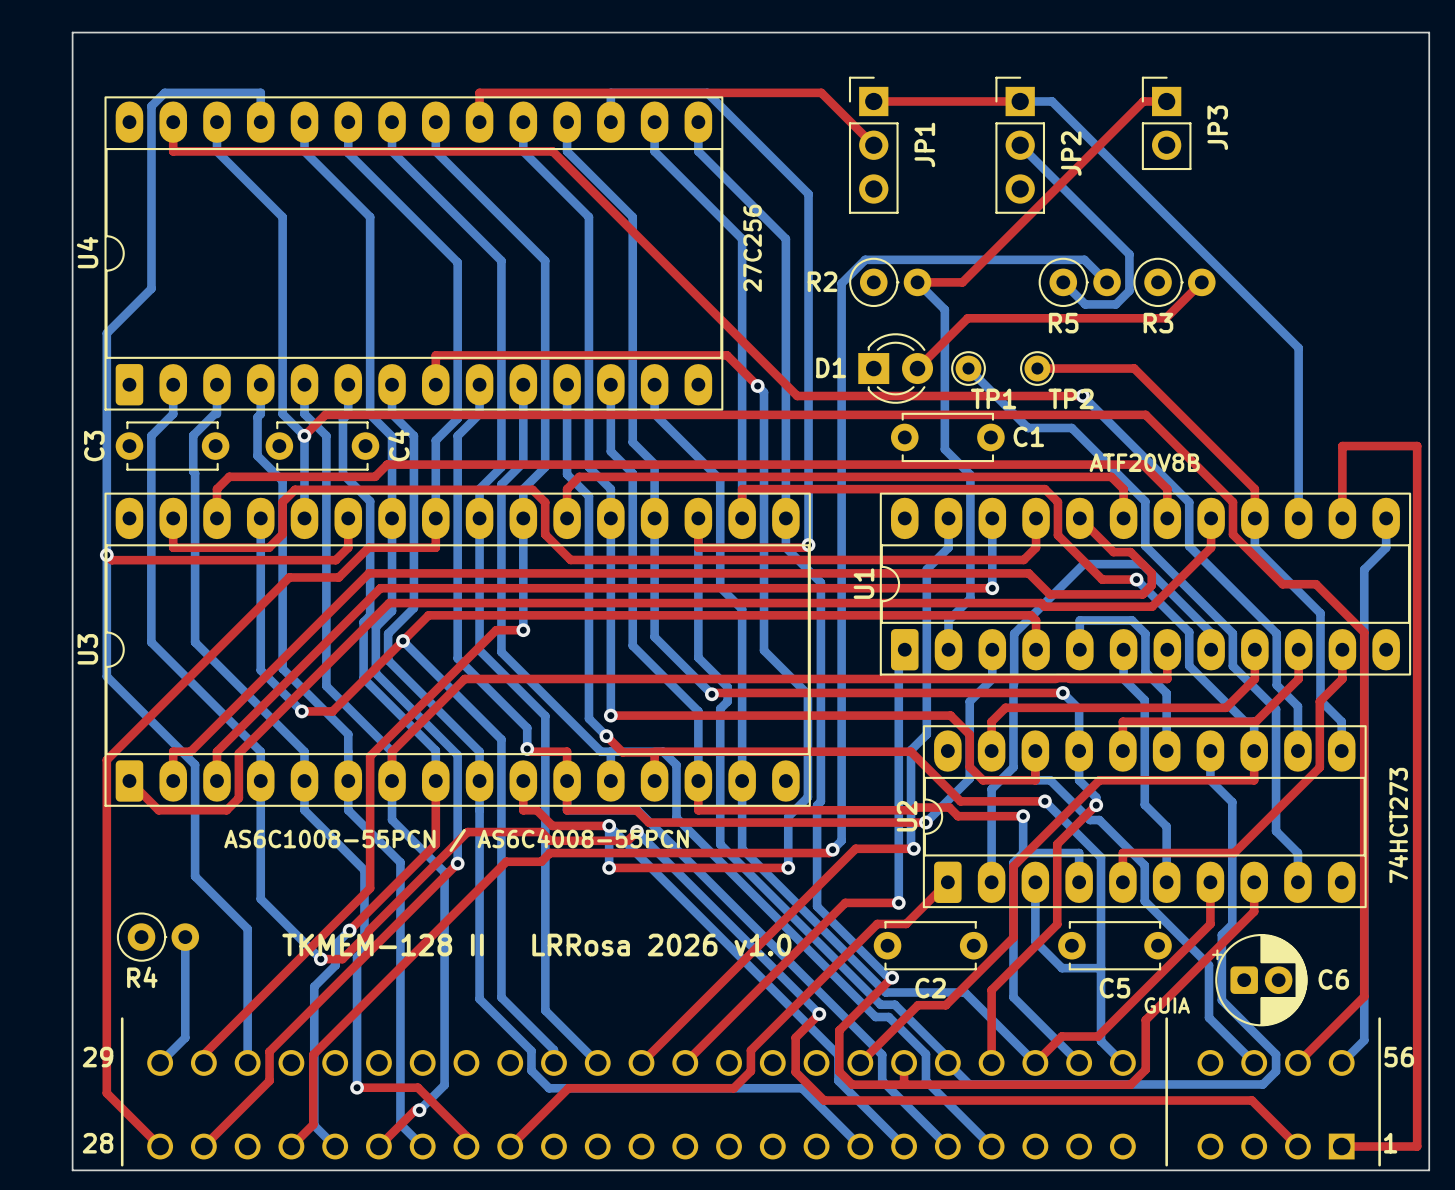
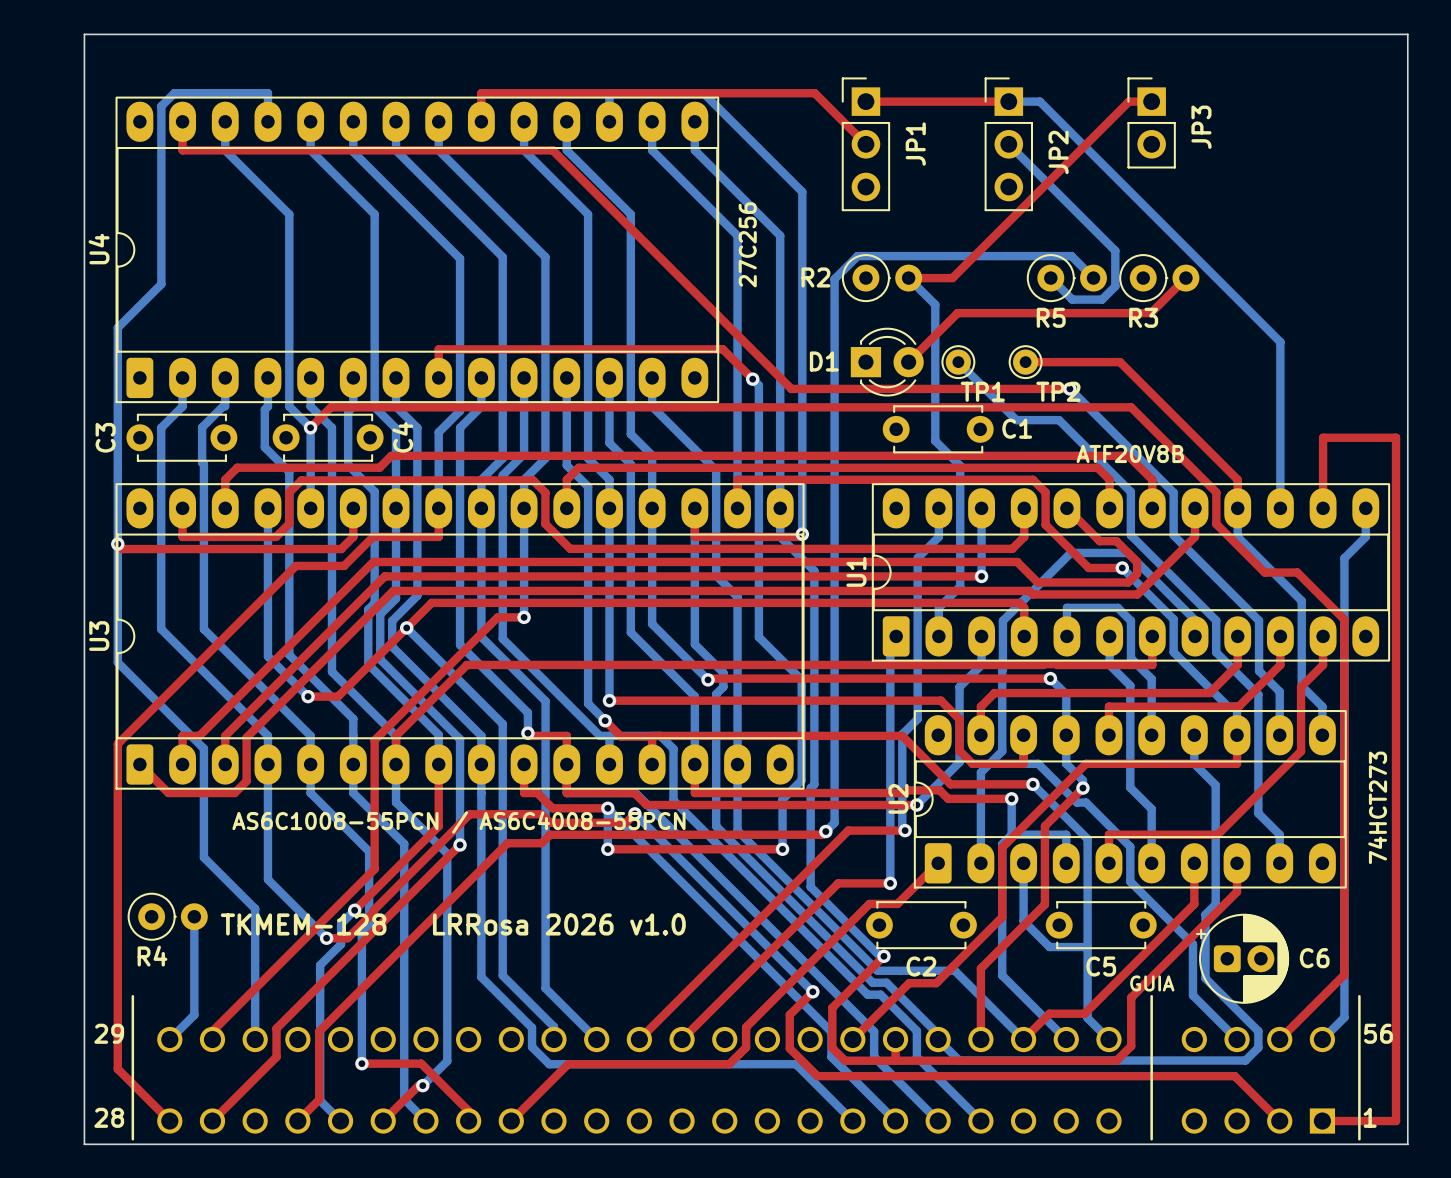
text: TKMEM-128 II LRRosa 2026 v1.0 (536, 945) -> TKMEM-128 LRRosa 2026 v1.0 (453, 924)

